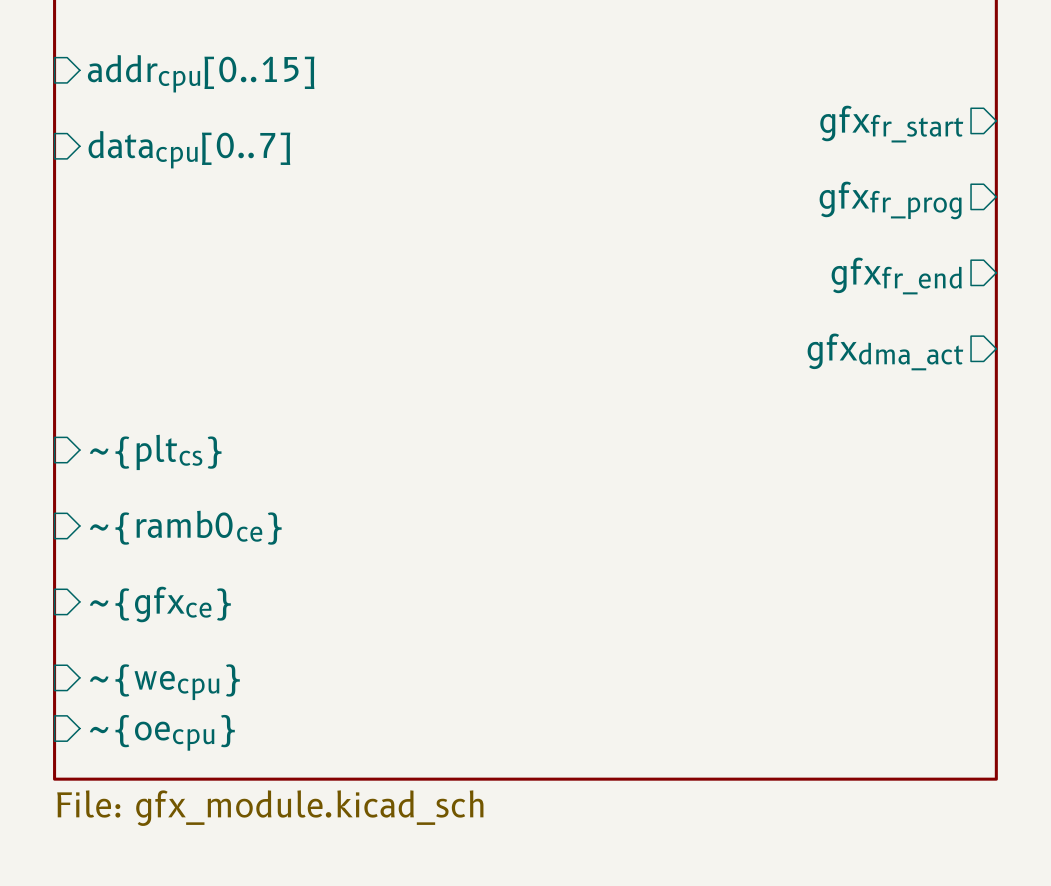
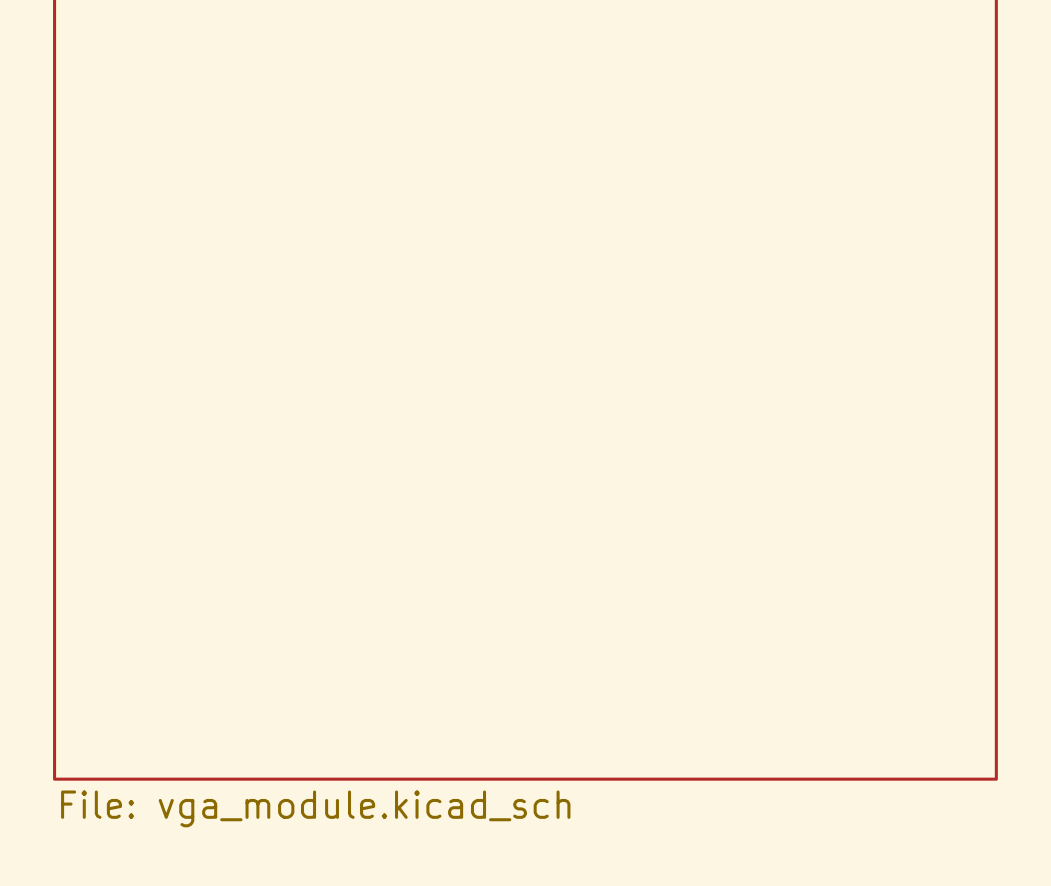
sheet pin: addrcpu[0..15] (201, 73) -> none
sheet pin: gfxfr_start (891, 124) -> none
sheet pin: datacpu[0..7] (189, 149) -> none
sheet pin: gfxfr_prog (890, 200) -> none
sheet pin: gfxfr_end (896, 276) -> none
sheet pin: gfxdma_act (885, 351) -> none
sheet pin: ~{pltcs} (155, 452) -> none
sheet pin: ~{ramb0ce} (185, 527) -> none
sheet pin: ~{gfxce} (160, 604) -> none
sheet pin: ~{wecpu} (164, 682) -> none
sheet pin: ~{oecpu} (162, 732) -> none
sheet value: File: gfx_module.kicad_sch (270, 808) -> File: vga_module.kicad_sch (315, 808)

